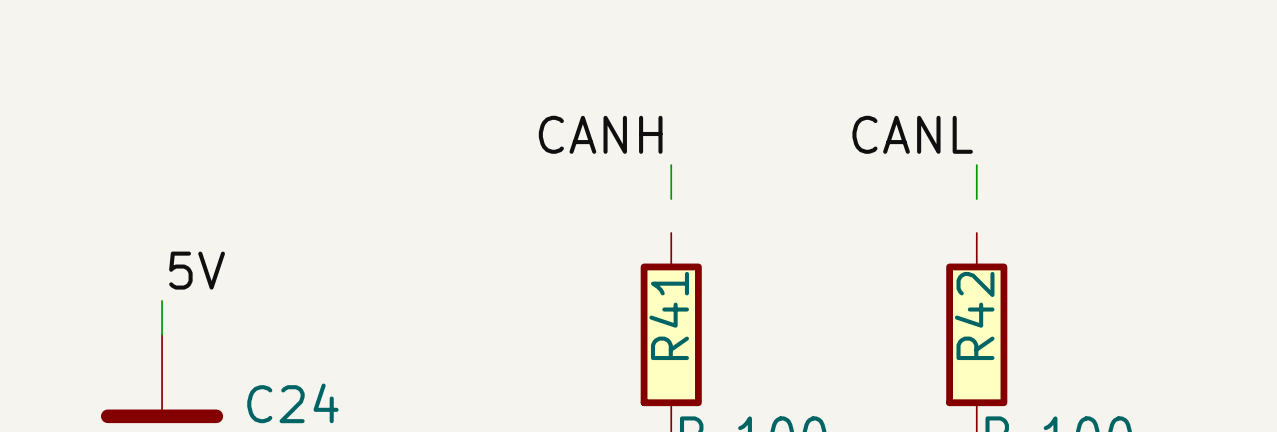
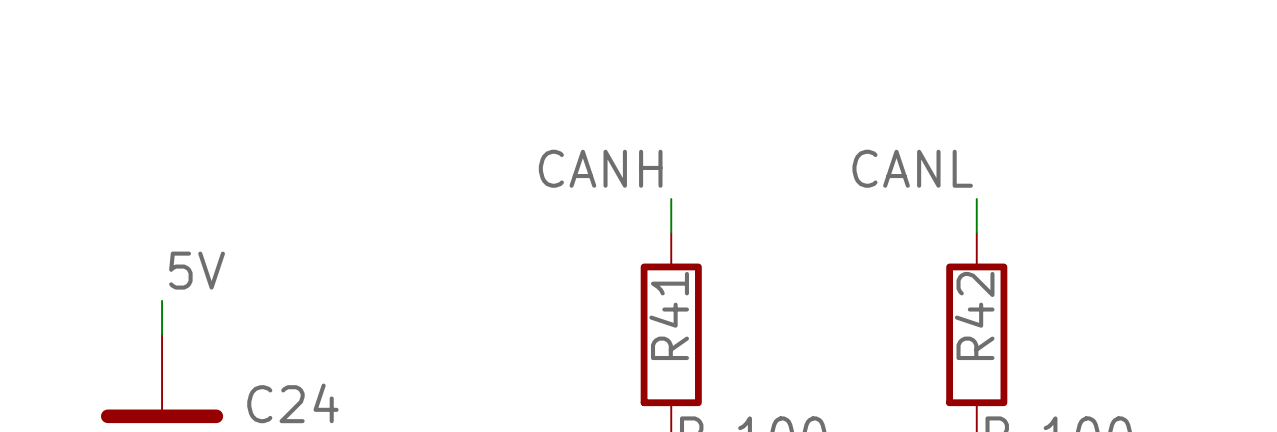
label position: CANH (600, 134) -> CANH (600, 168)
label position: CANL (912, 134) -> CANL (912, 168)
wire: (671, 165) (671, 199) -> (671, 232) (671, 199)
wire: (976, 165) (976, 199) -> (976, 232) (976, 199)

